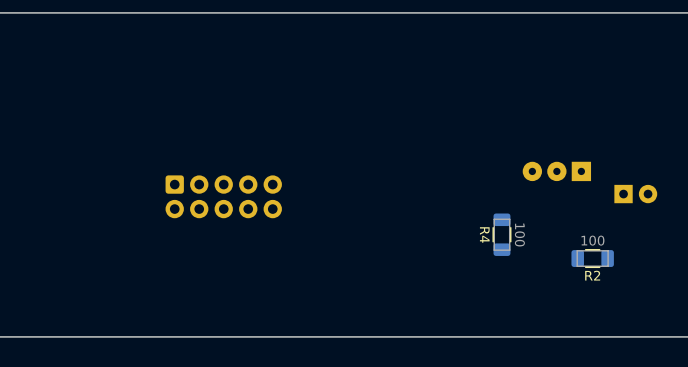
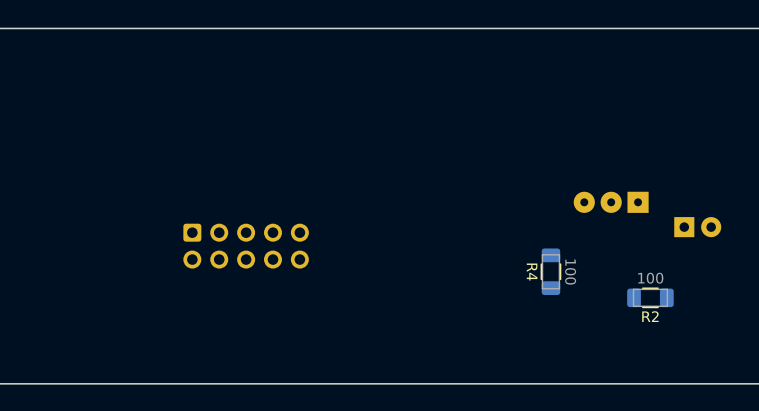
part: (223, 196) -> none
part: none -> (246, 246)

